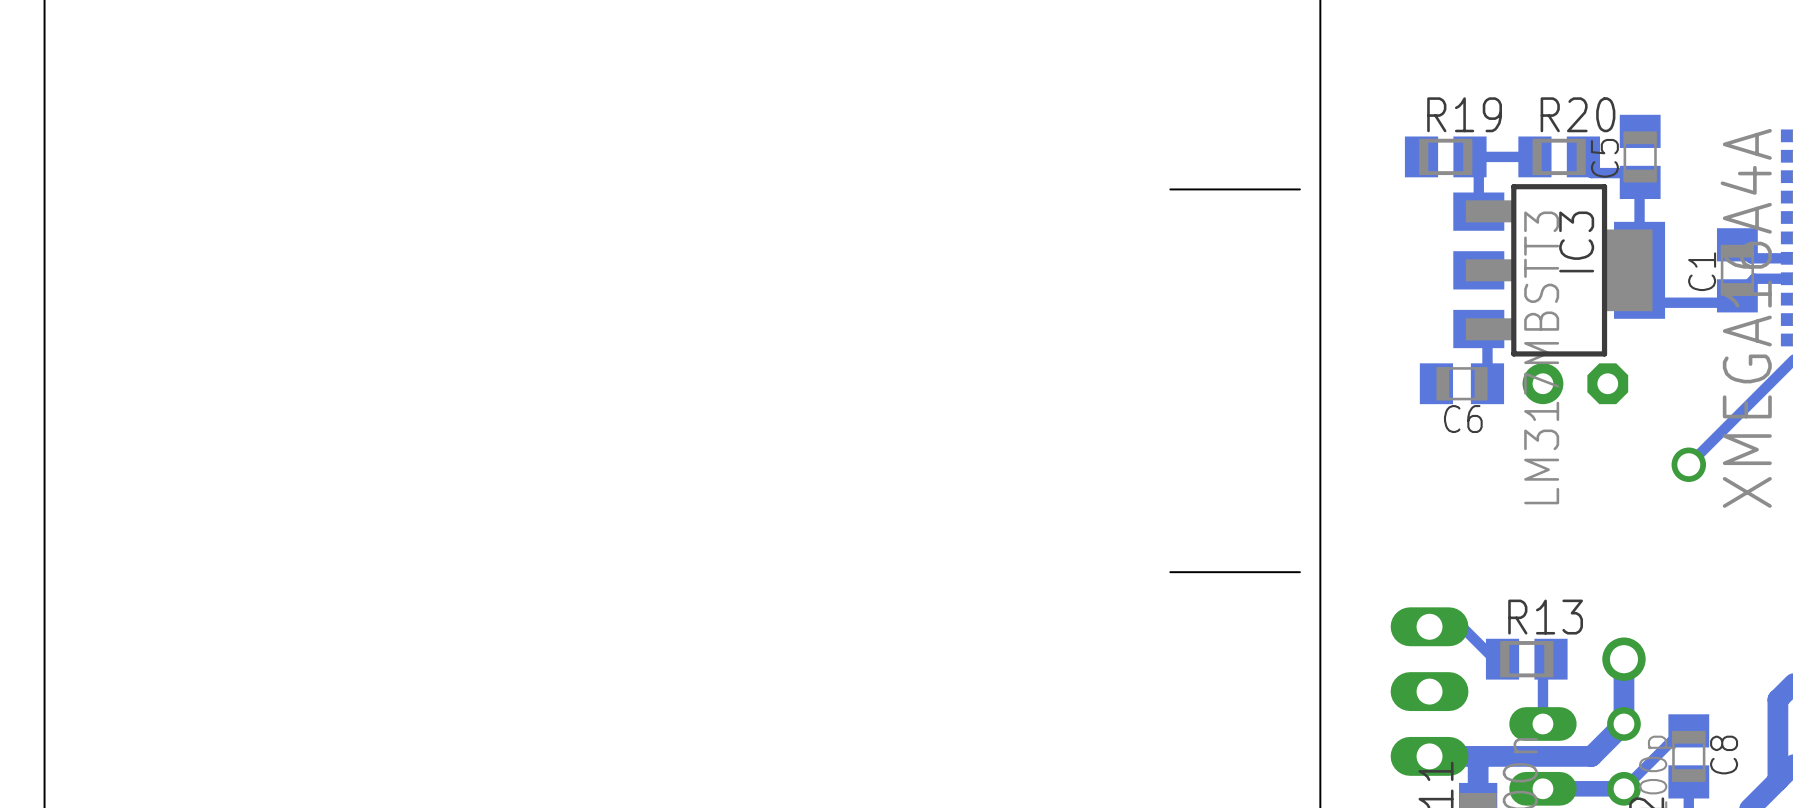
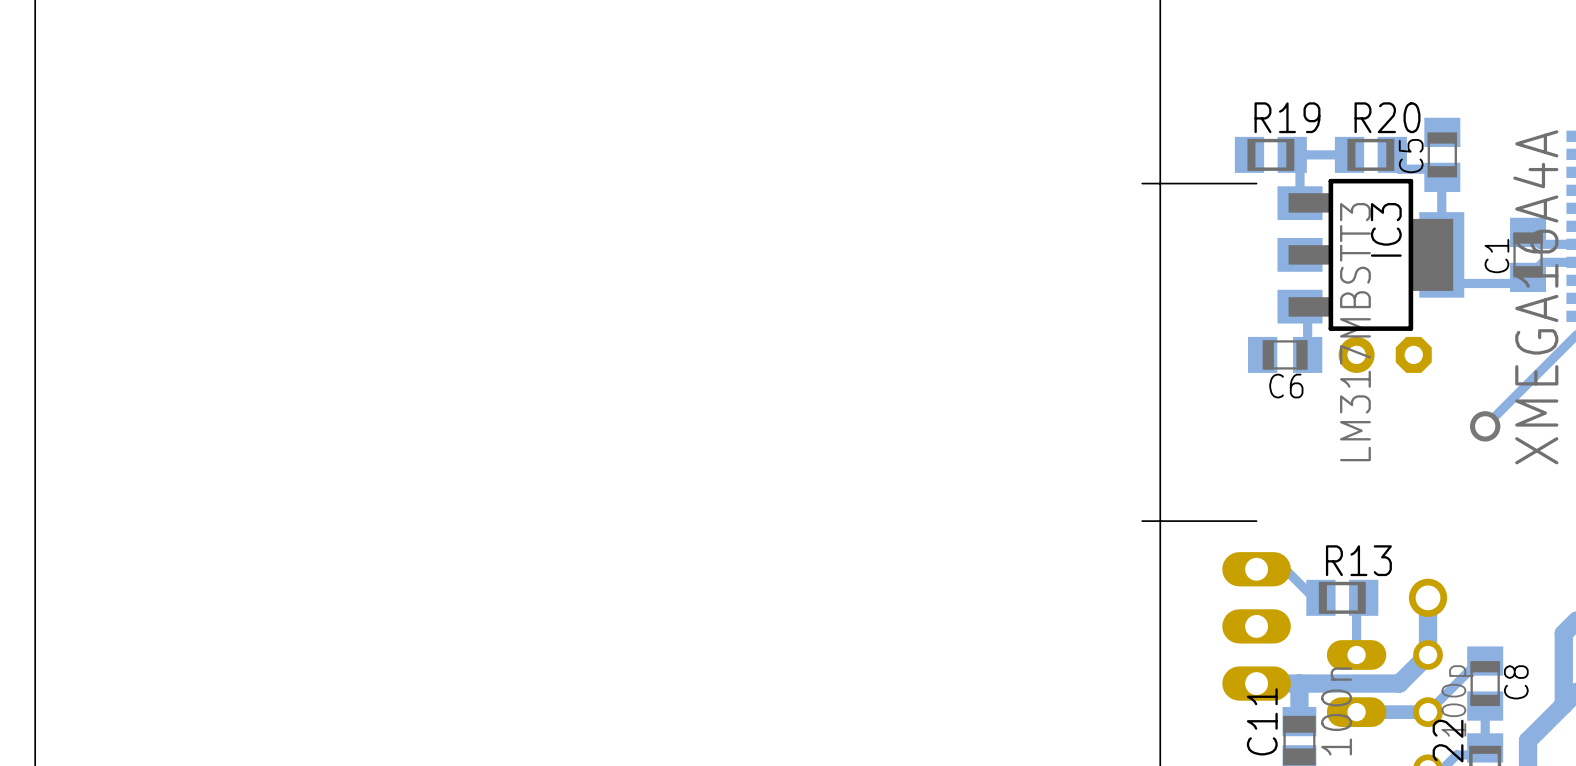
board edge: (1299, 189) (1170, 189) -> (1142, 183) (1256, 183)
board edge: (1299, 572) (1170, 572) -> (1142, 521) (1256, 521)

